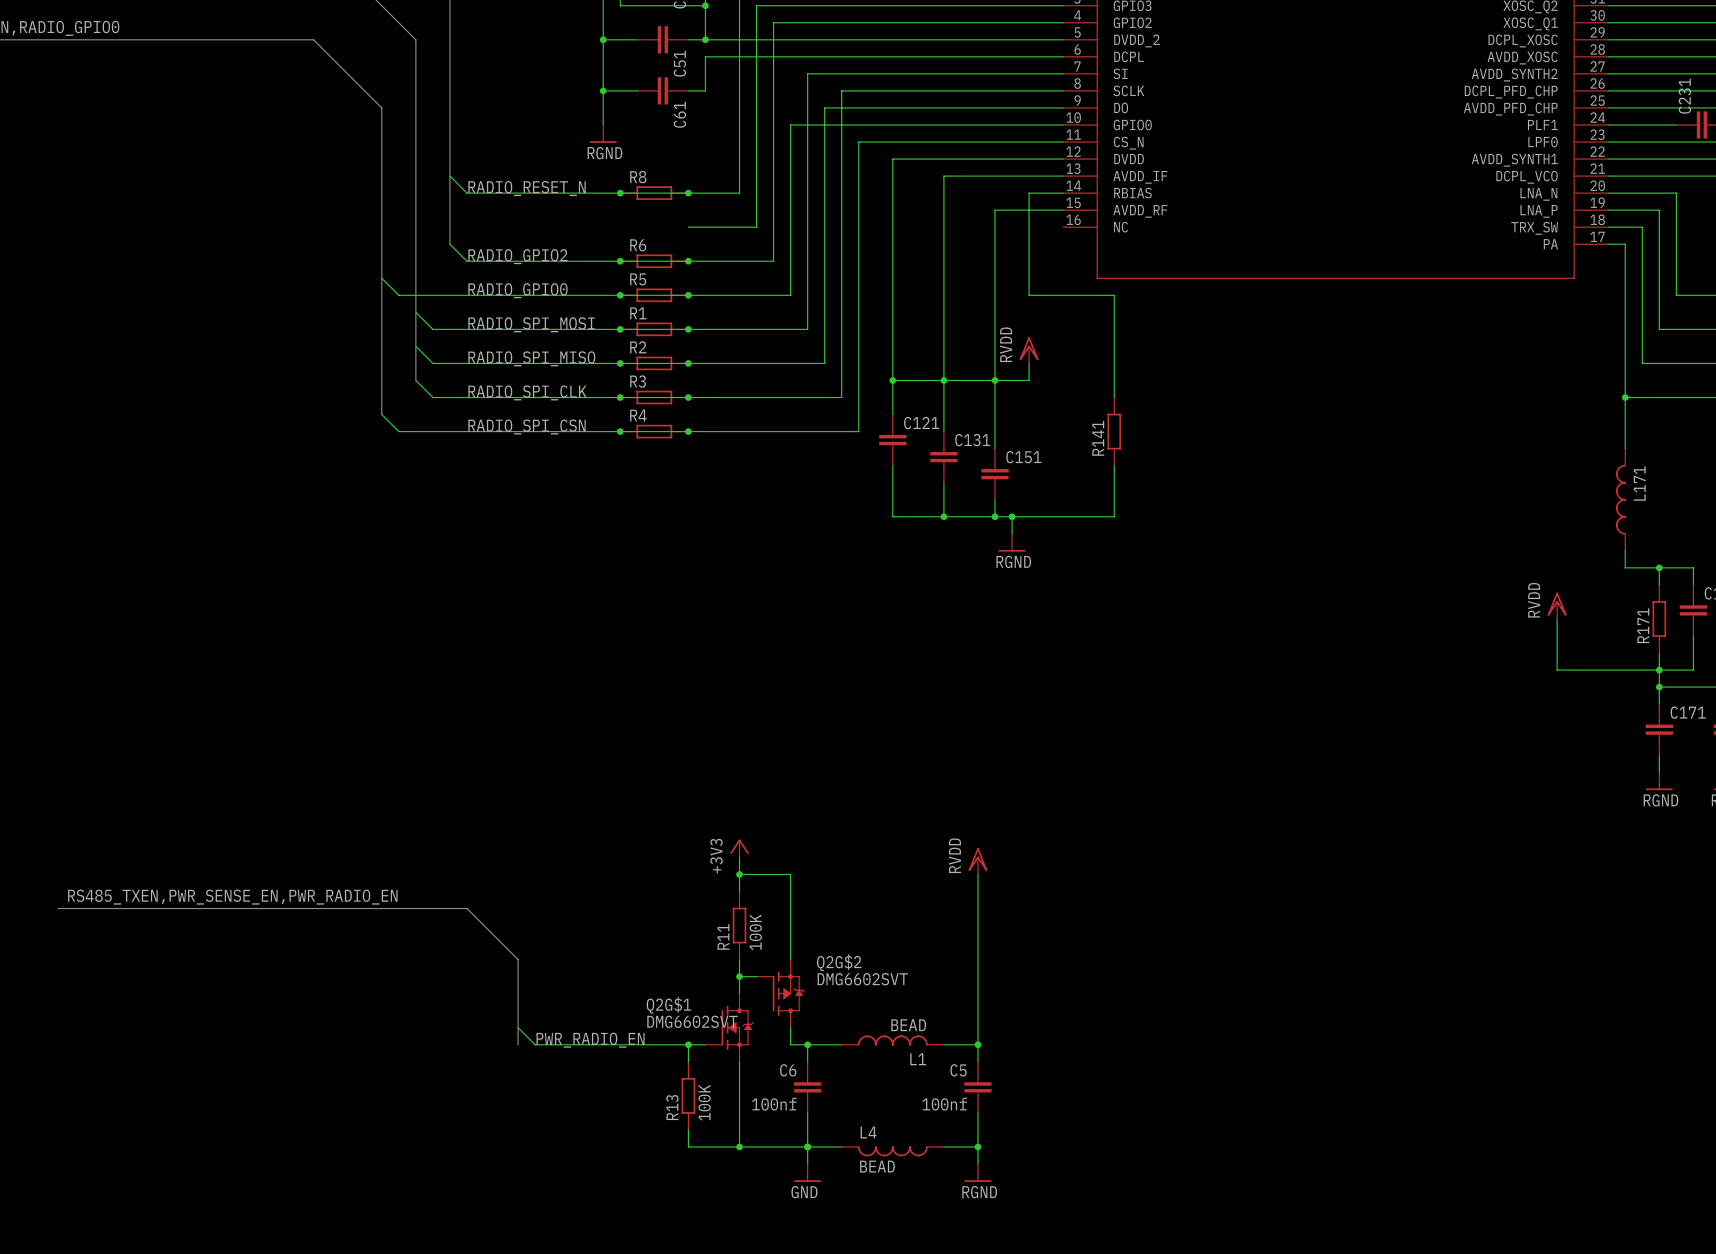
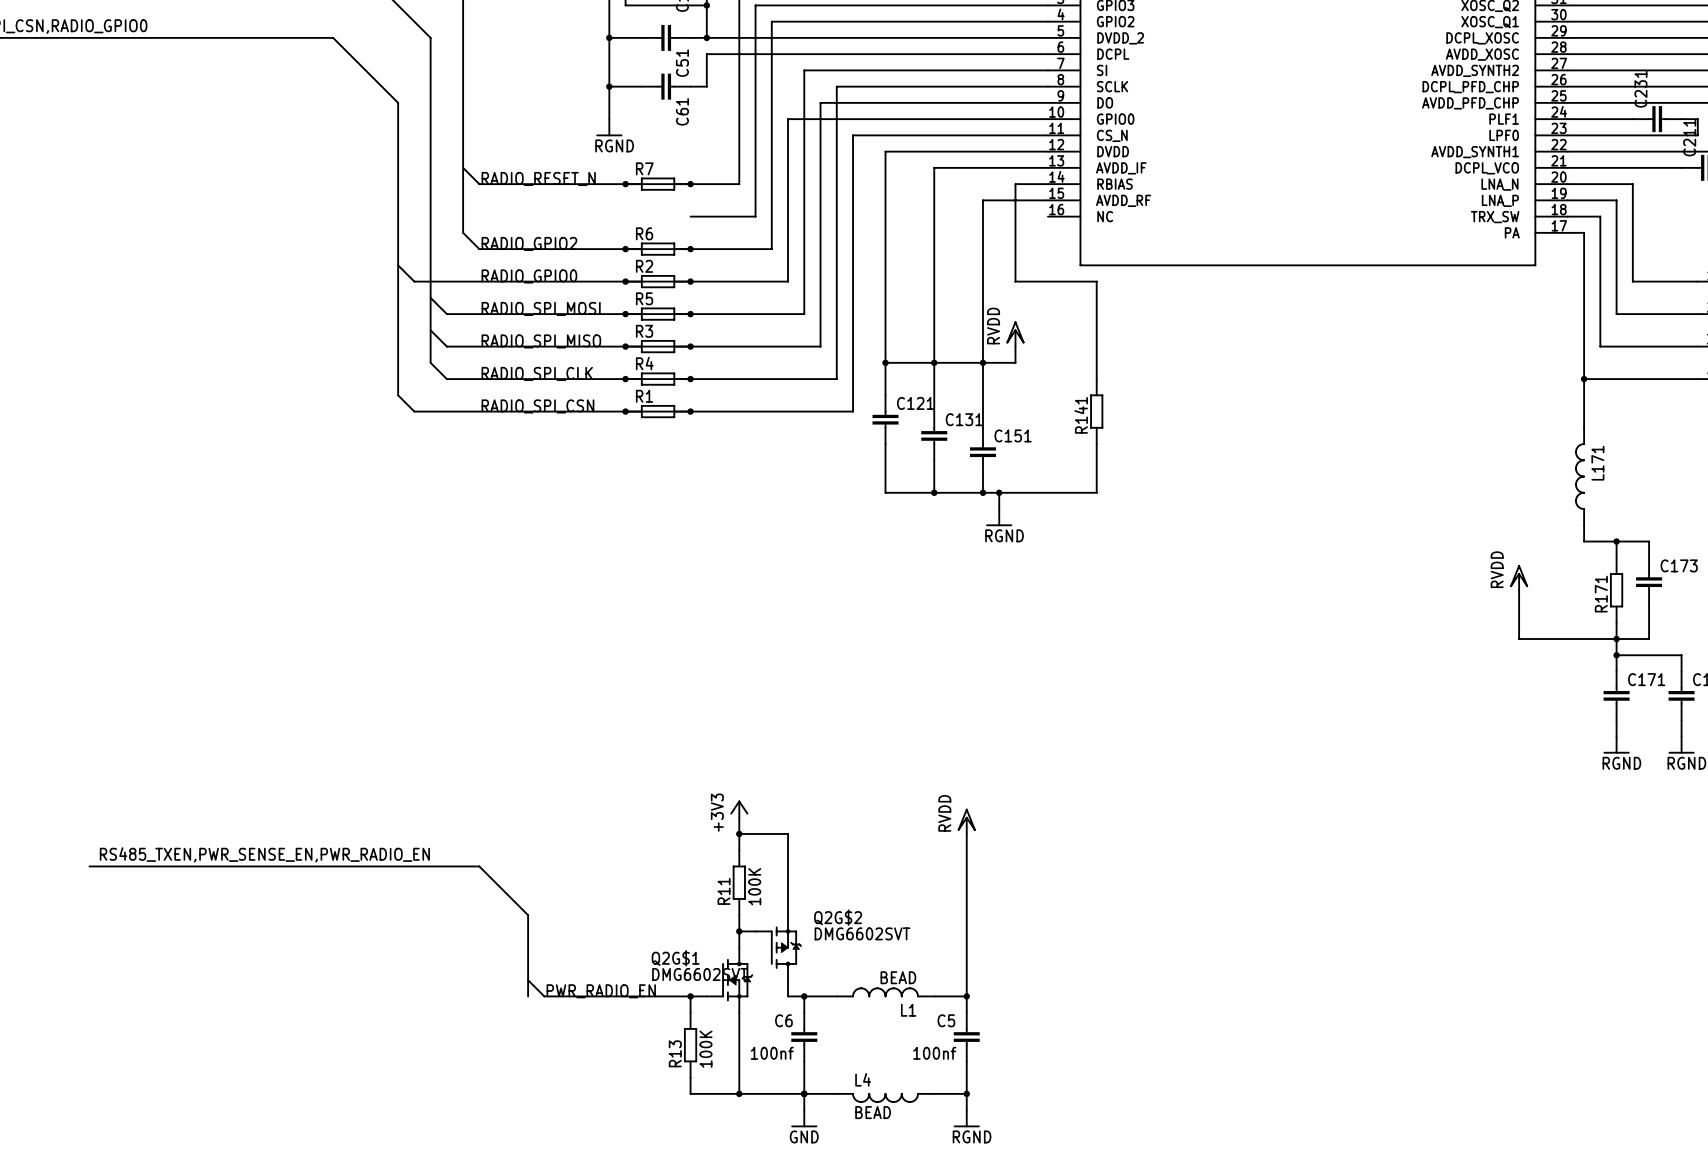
R8 name: R8 (638, 177) -> R7 (644, 168)
R5 name: R5 (638, 279) -> R2 (644, 266)
R1 name: R1 (638, 313) -> R5 (644, 298)
R2 name: R2 (638, 347) -> R3 (644, 331)
R3 name: R3 (638, 381) -> R4 (644, 363)
R4 name: R4 (638, 415) -> R1 (644, 396)

